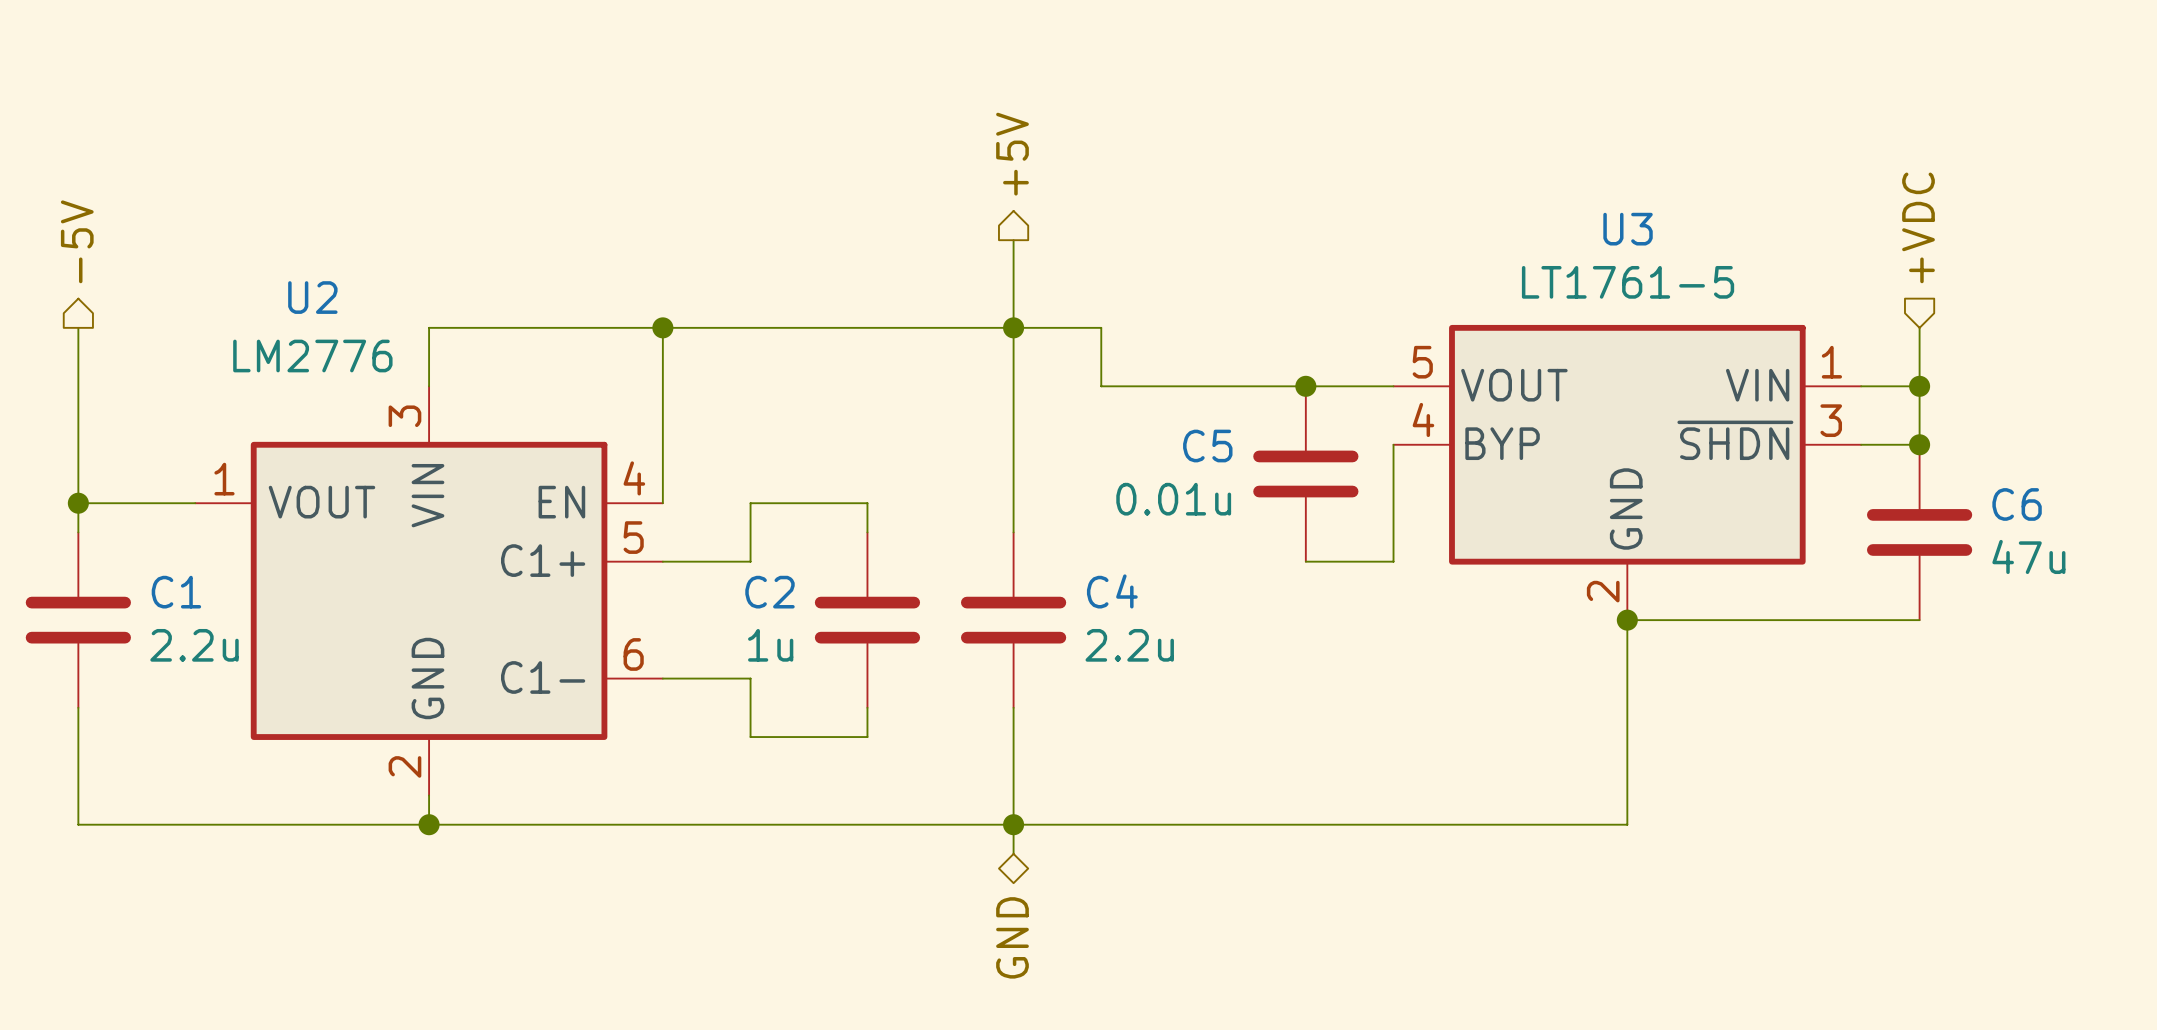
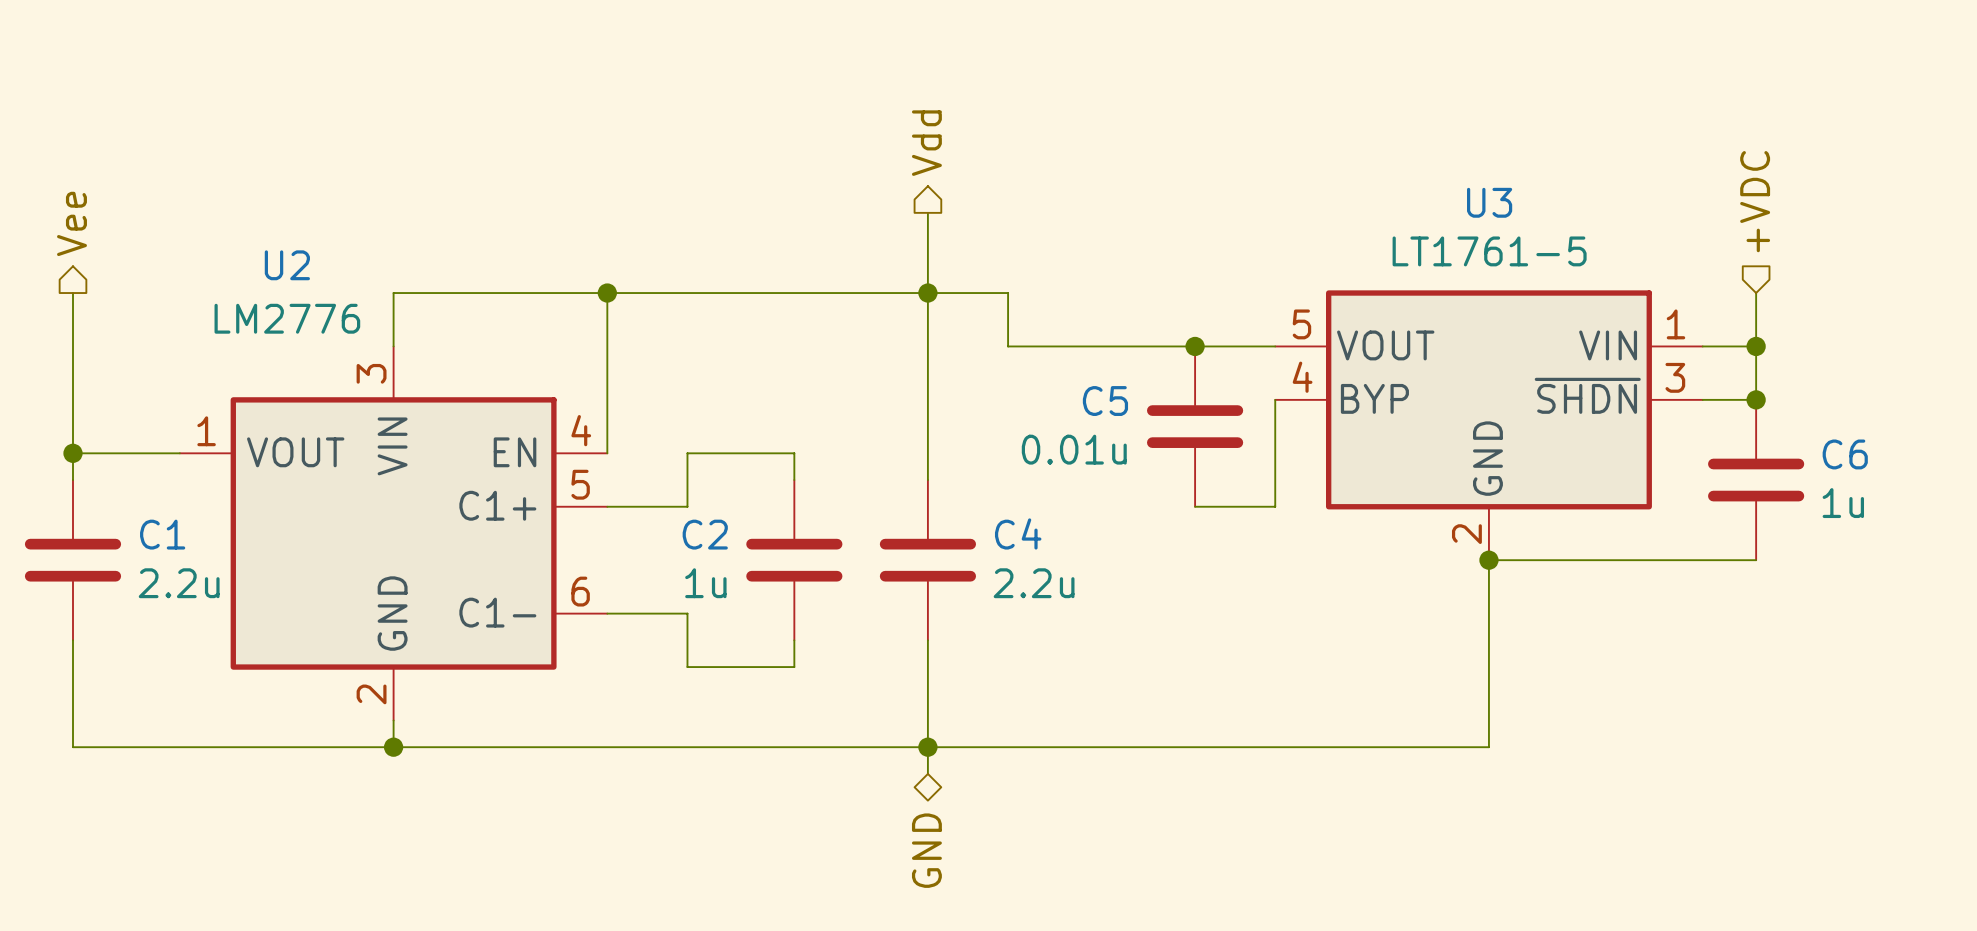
hierarchical label: +5V (1012, 154) -> Vdd (926, 143)
hierarchical label: -5V (77, 241) -> Vee (72, 223)
C6 value: 47u (2028, 556) -> 1u (1843, 503)

